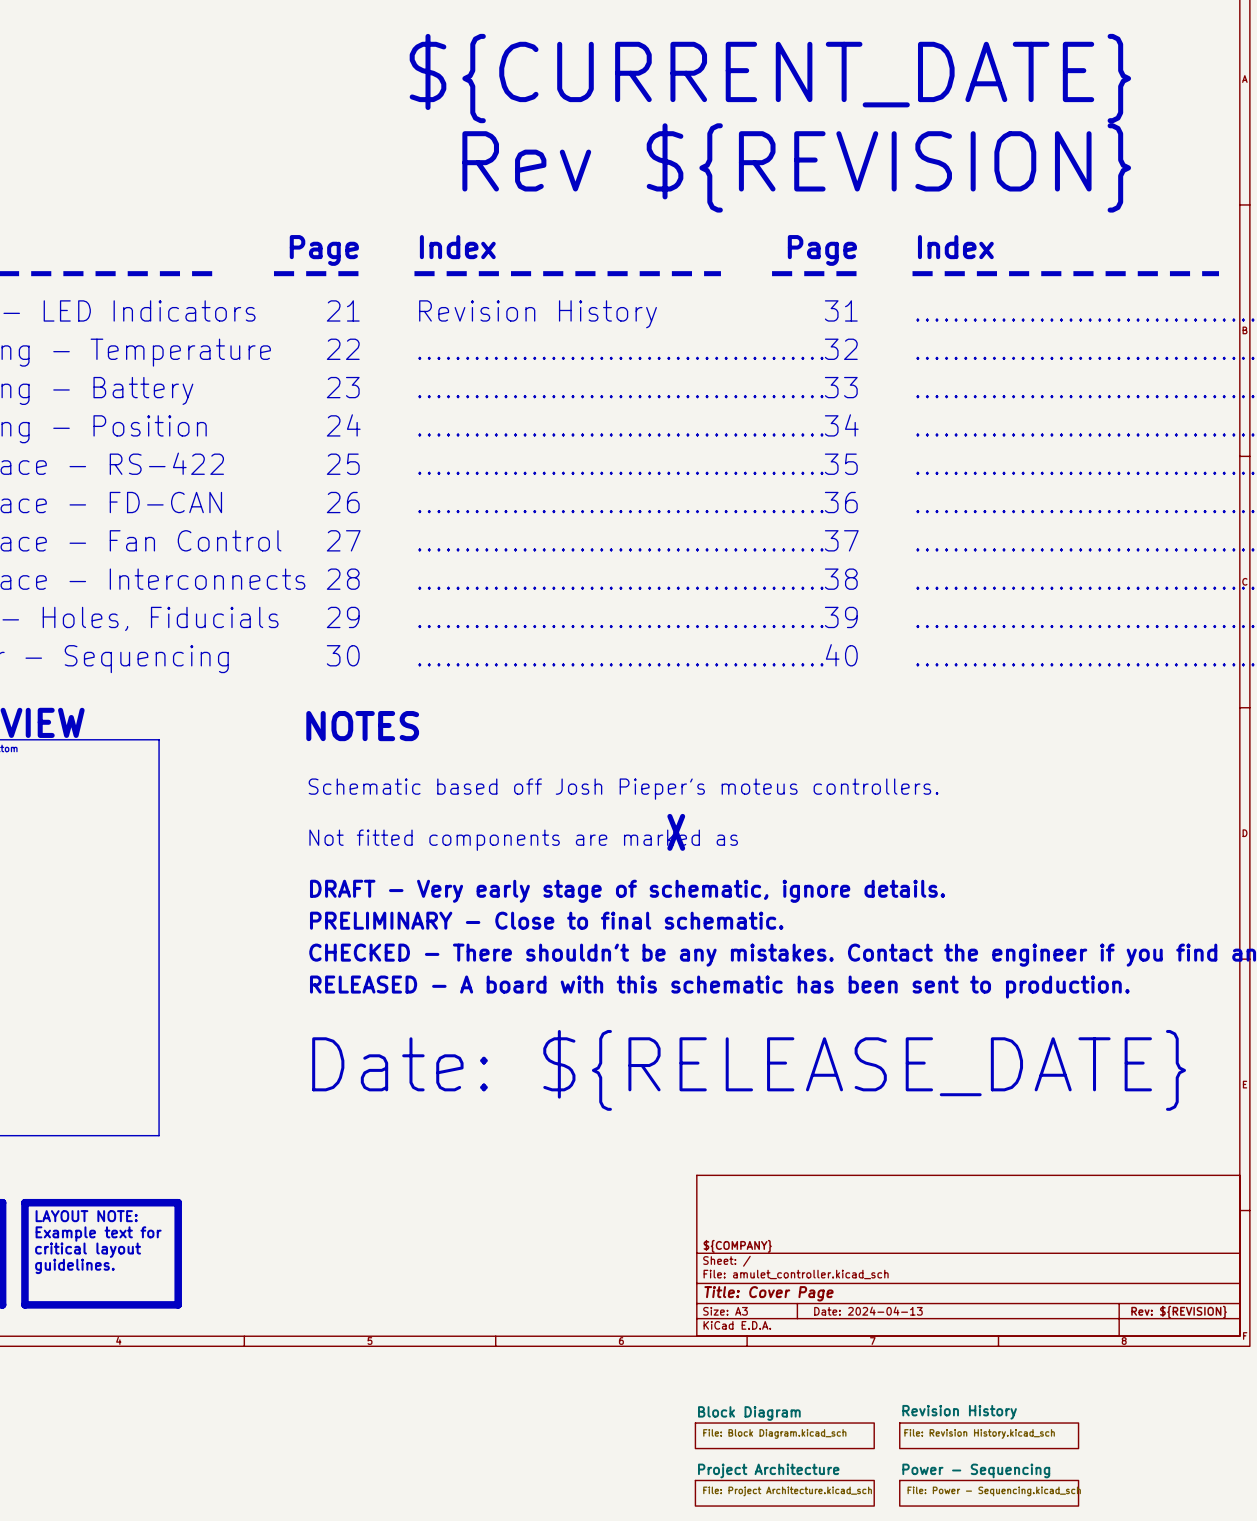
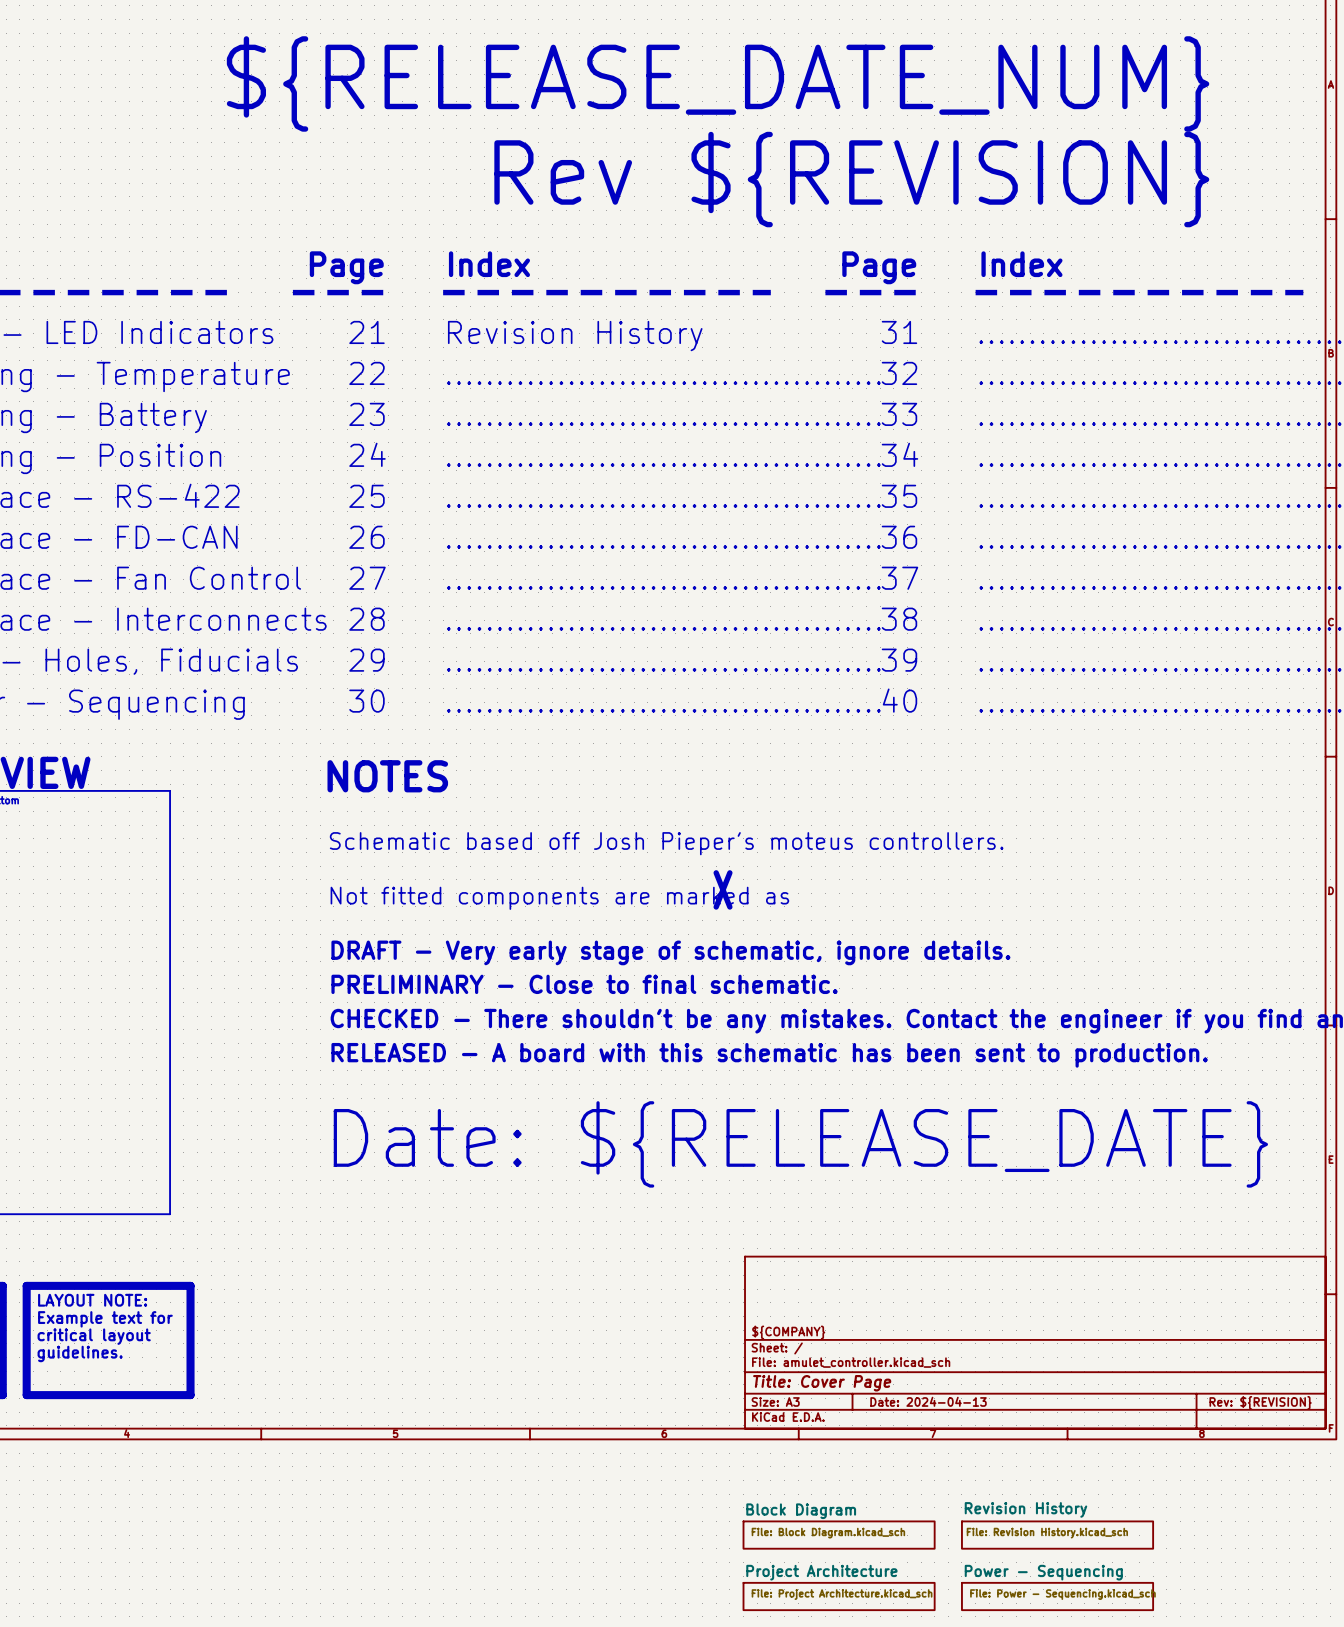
text: ${CURRENT_DATE} (770, 78) -> ${RELEASE_DATE_NUM} (718, 83)

